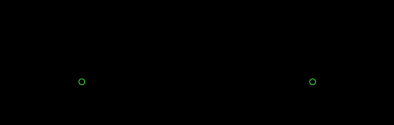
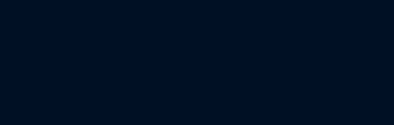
via: (81, 81) -> none
via: (312, 81) -> none

